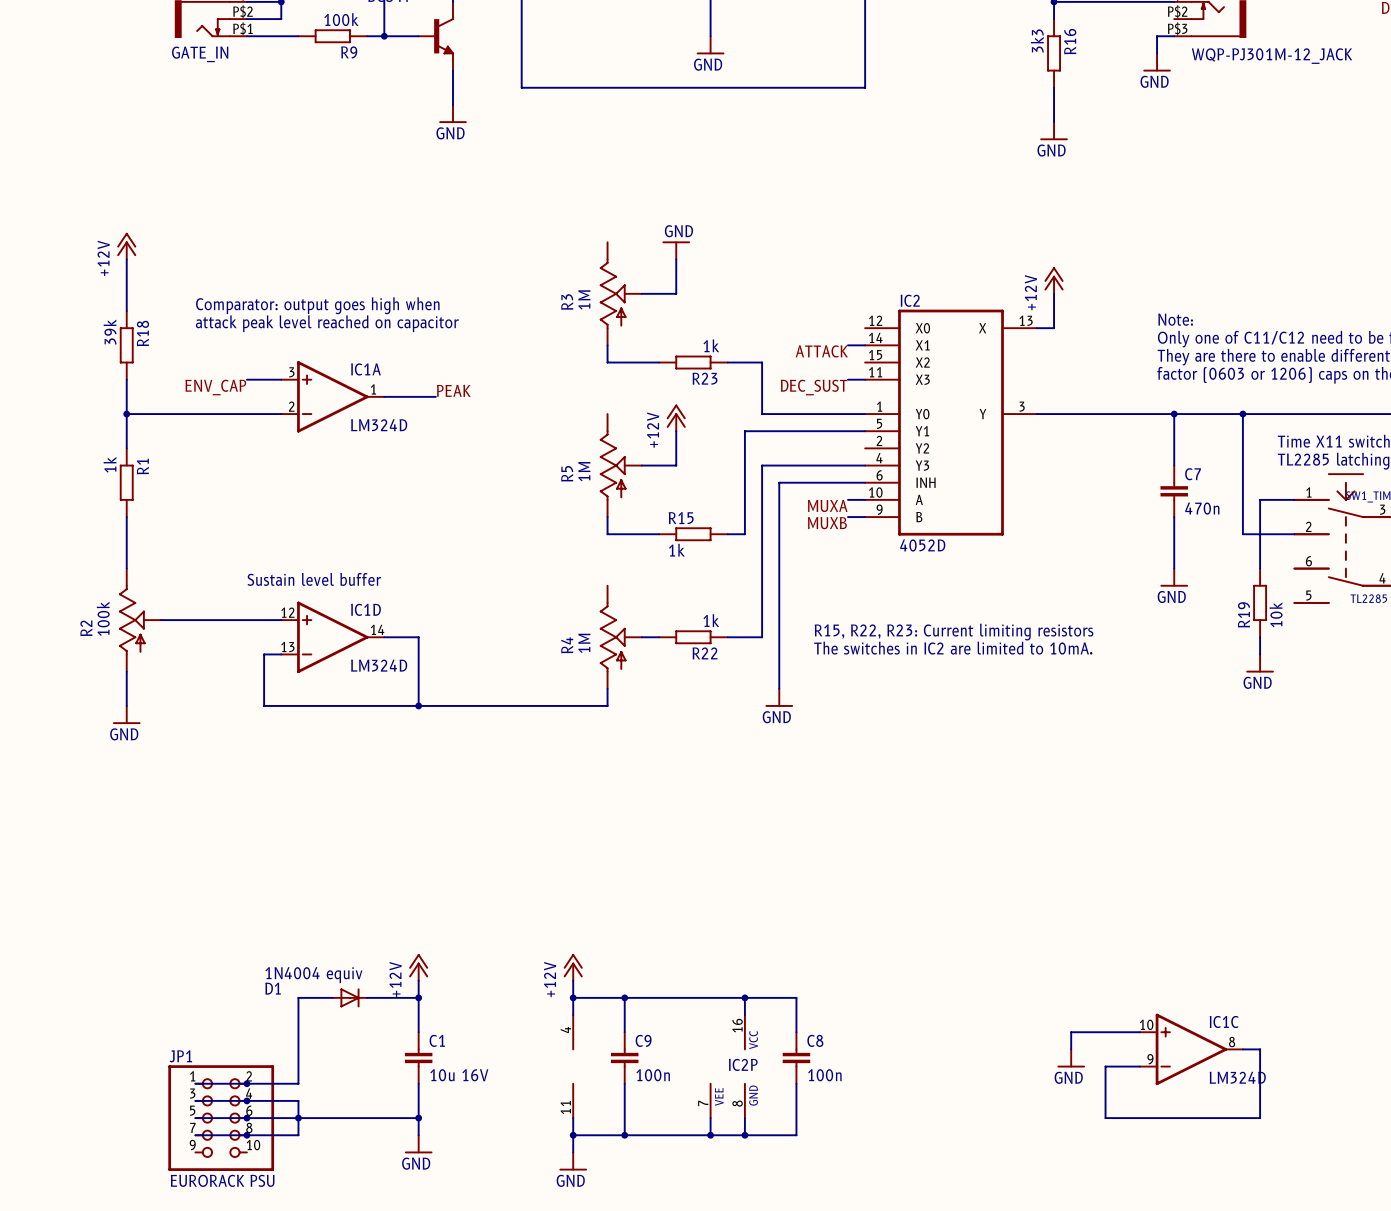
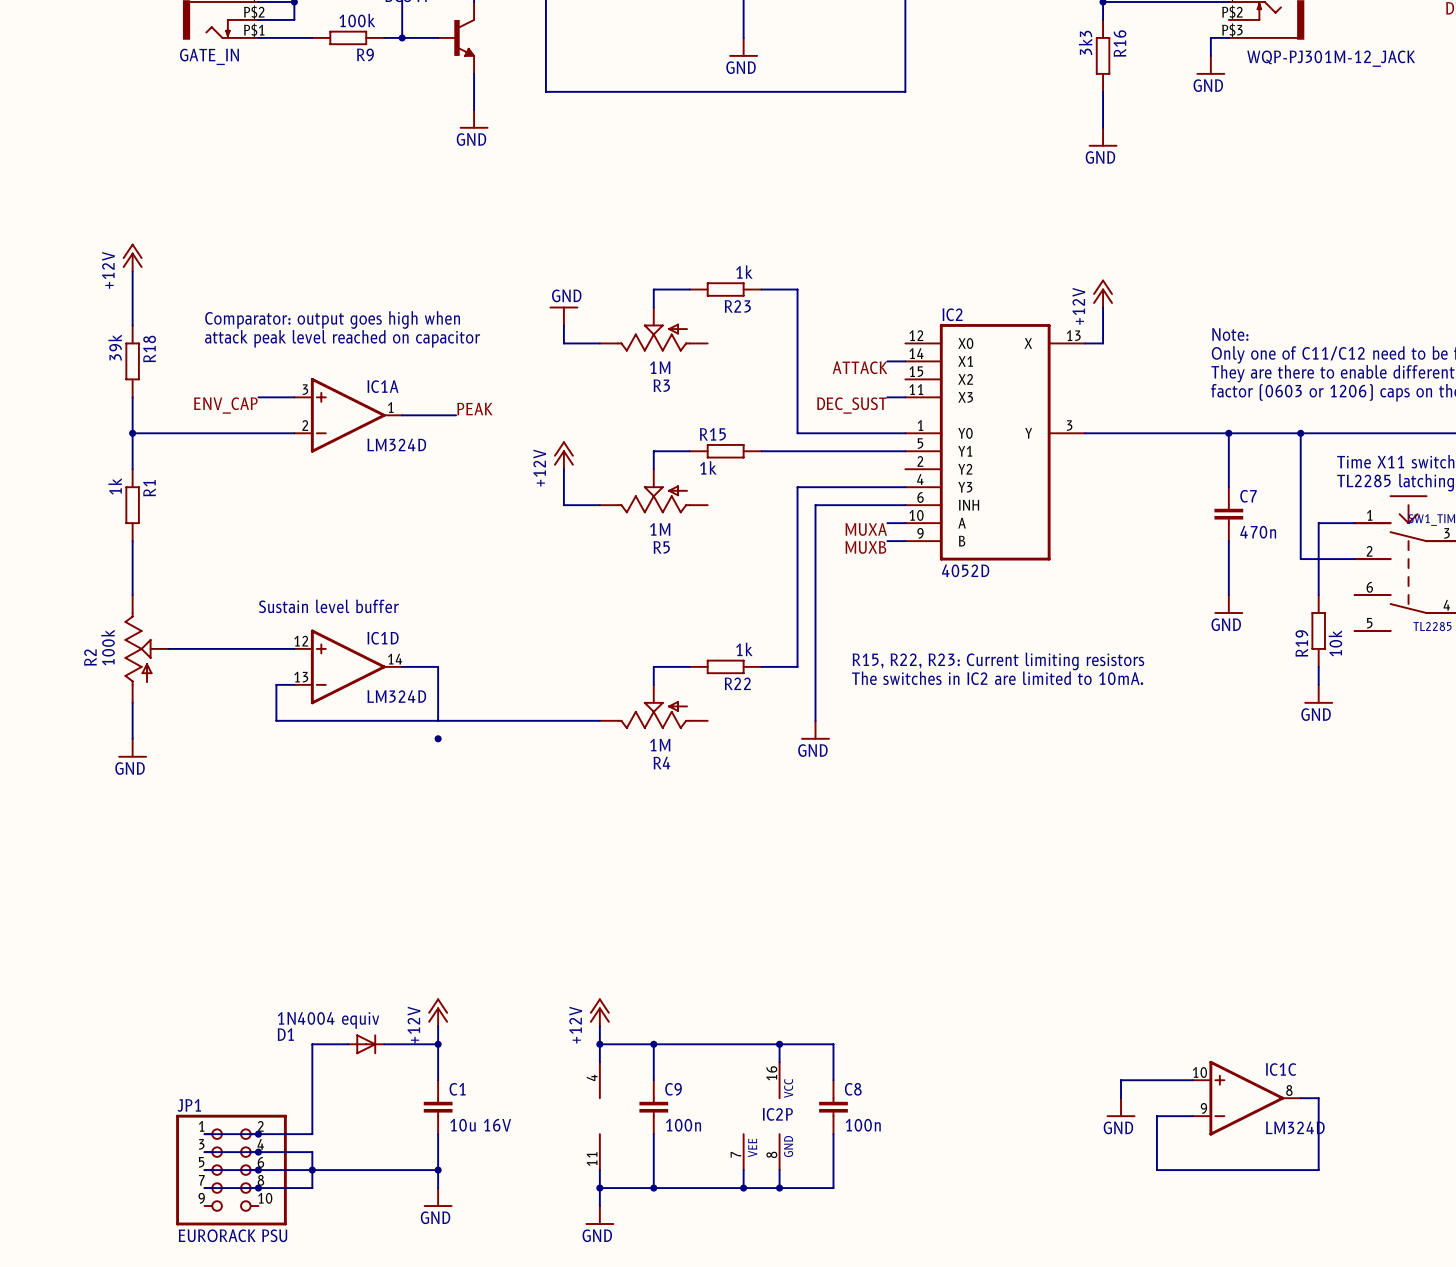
power symbol position: GND (676, 250) -> GND (563, 316)
wire: (676, 259) (676, 293) (641, 293) -> none
wire: none -> (689, 289) (653, 289) (653, 307)
R3 rotation: 0° (612, 293) -> 90° counterclockwise (653, 337)
wire: none -> (563, 325) (563, 343) (599, 343)
wire: (607, 345) (607, 362) (659, 362) -> none
R23 position: (693, 362) -> (725, 289)
wire: (727, 362) (762, 362) -> (761, 289) (797, 289) (797, 379)
power symbol position: +12V (676, 417) -> +12V (563, 455)
wire: none -> (689, 451) (653, 451) (653, 469)
wire: (676, 431) (676, 465) (641, 465) -> none
wire: (744, 431) (744, 534) (727, 534) -> (779, 451) (761, 451)
wire: none -> (563, 469) (563, 505) (599, 505)
R5 rotation: 0° (612, 465) -> 90° counterclockwise (653, 499)
wire: (607, 517) (607, 534) (659, 534) -> none
R15 position: (693, 534) -> (725, 451)
R4 rotation: 0° (612, 637) -> 90° counterclockwise (653, 715)
wire: (264, 688) (264, 705) (607, 705) (607, 688) -> (276, 720) (599, 720)
wire: (418, 688) (418, 705) -> none

